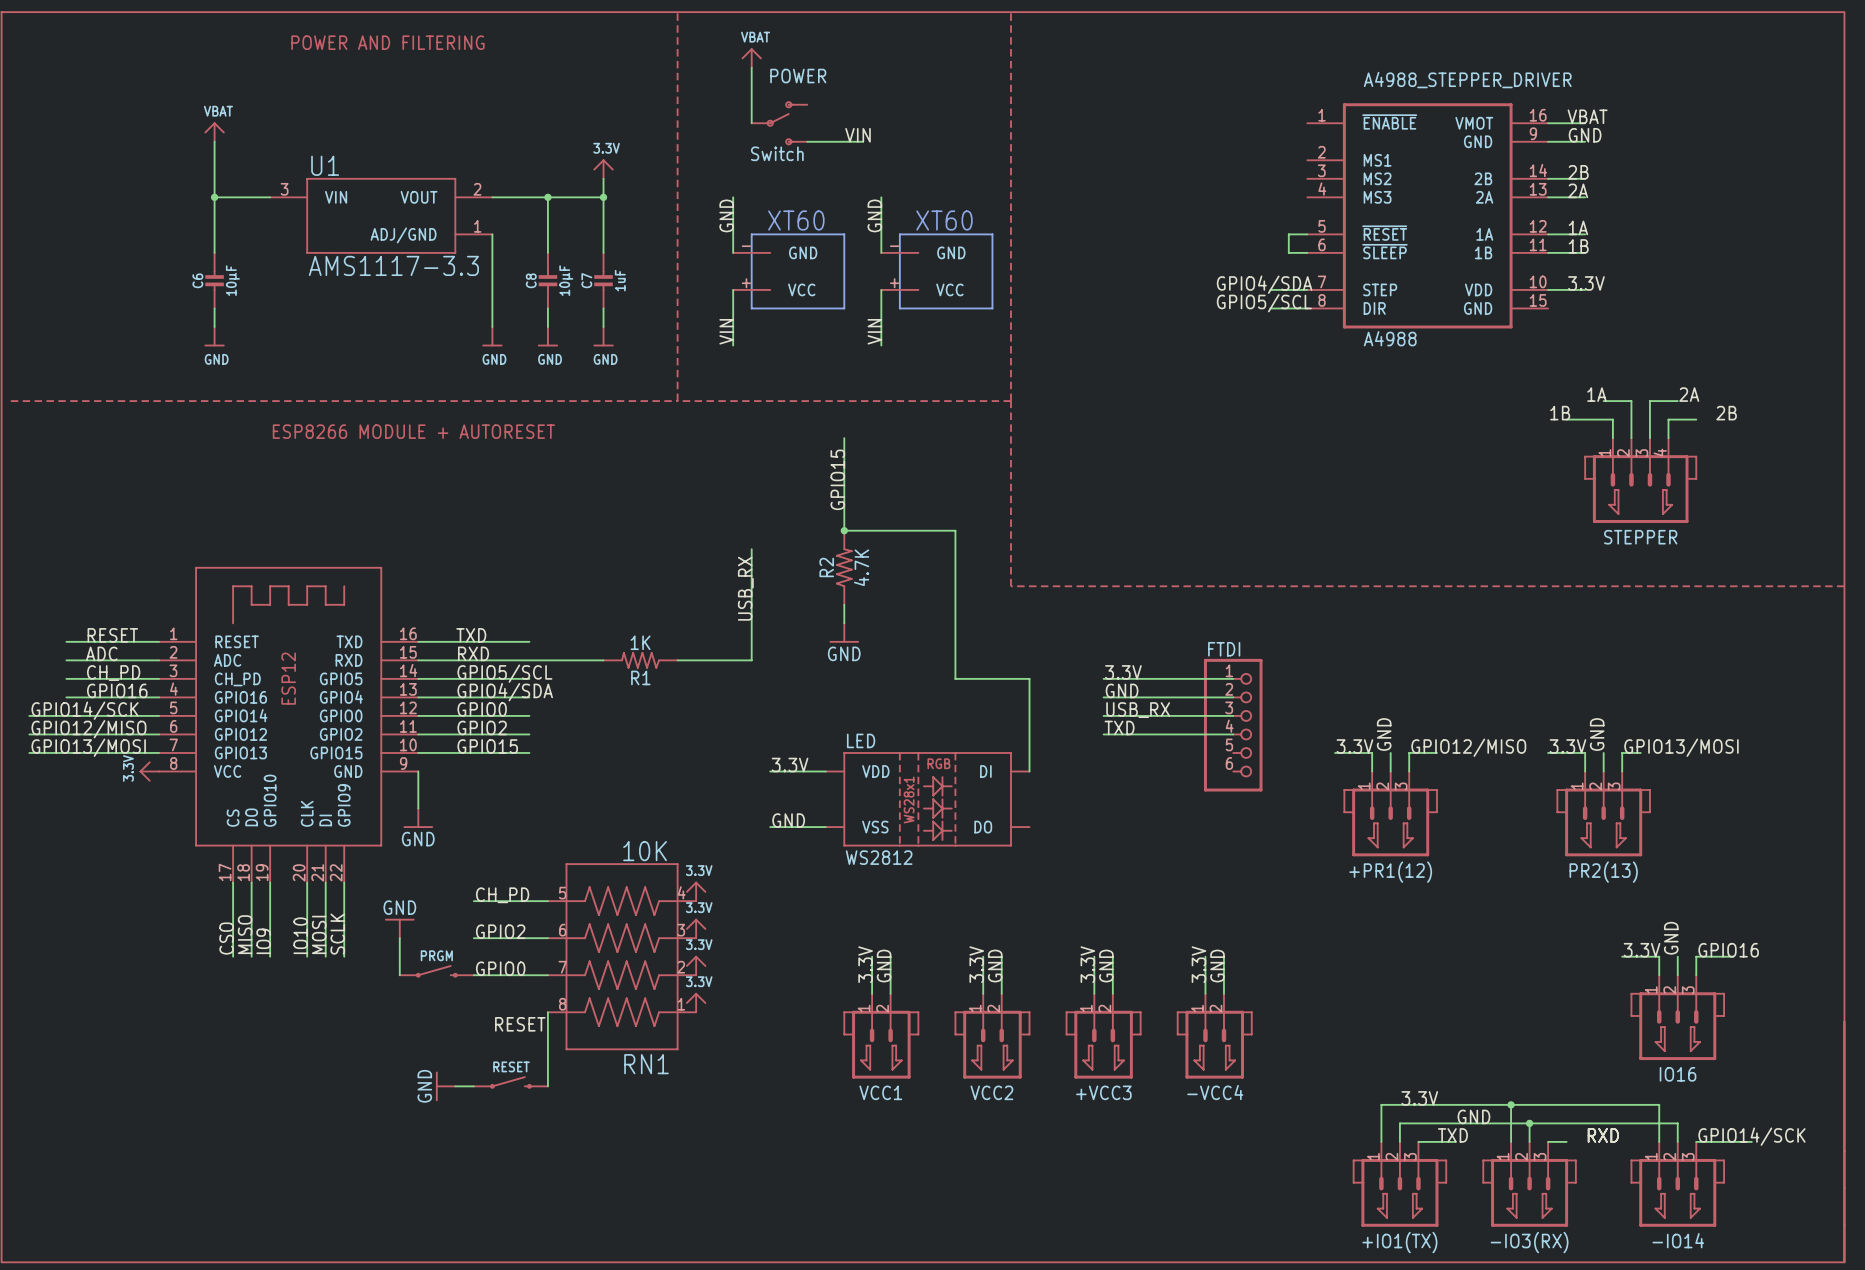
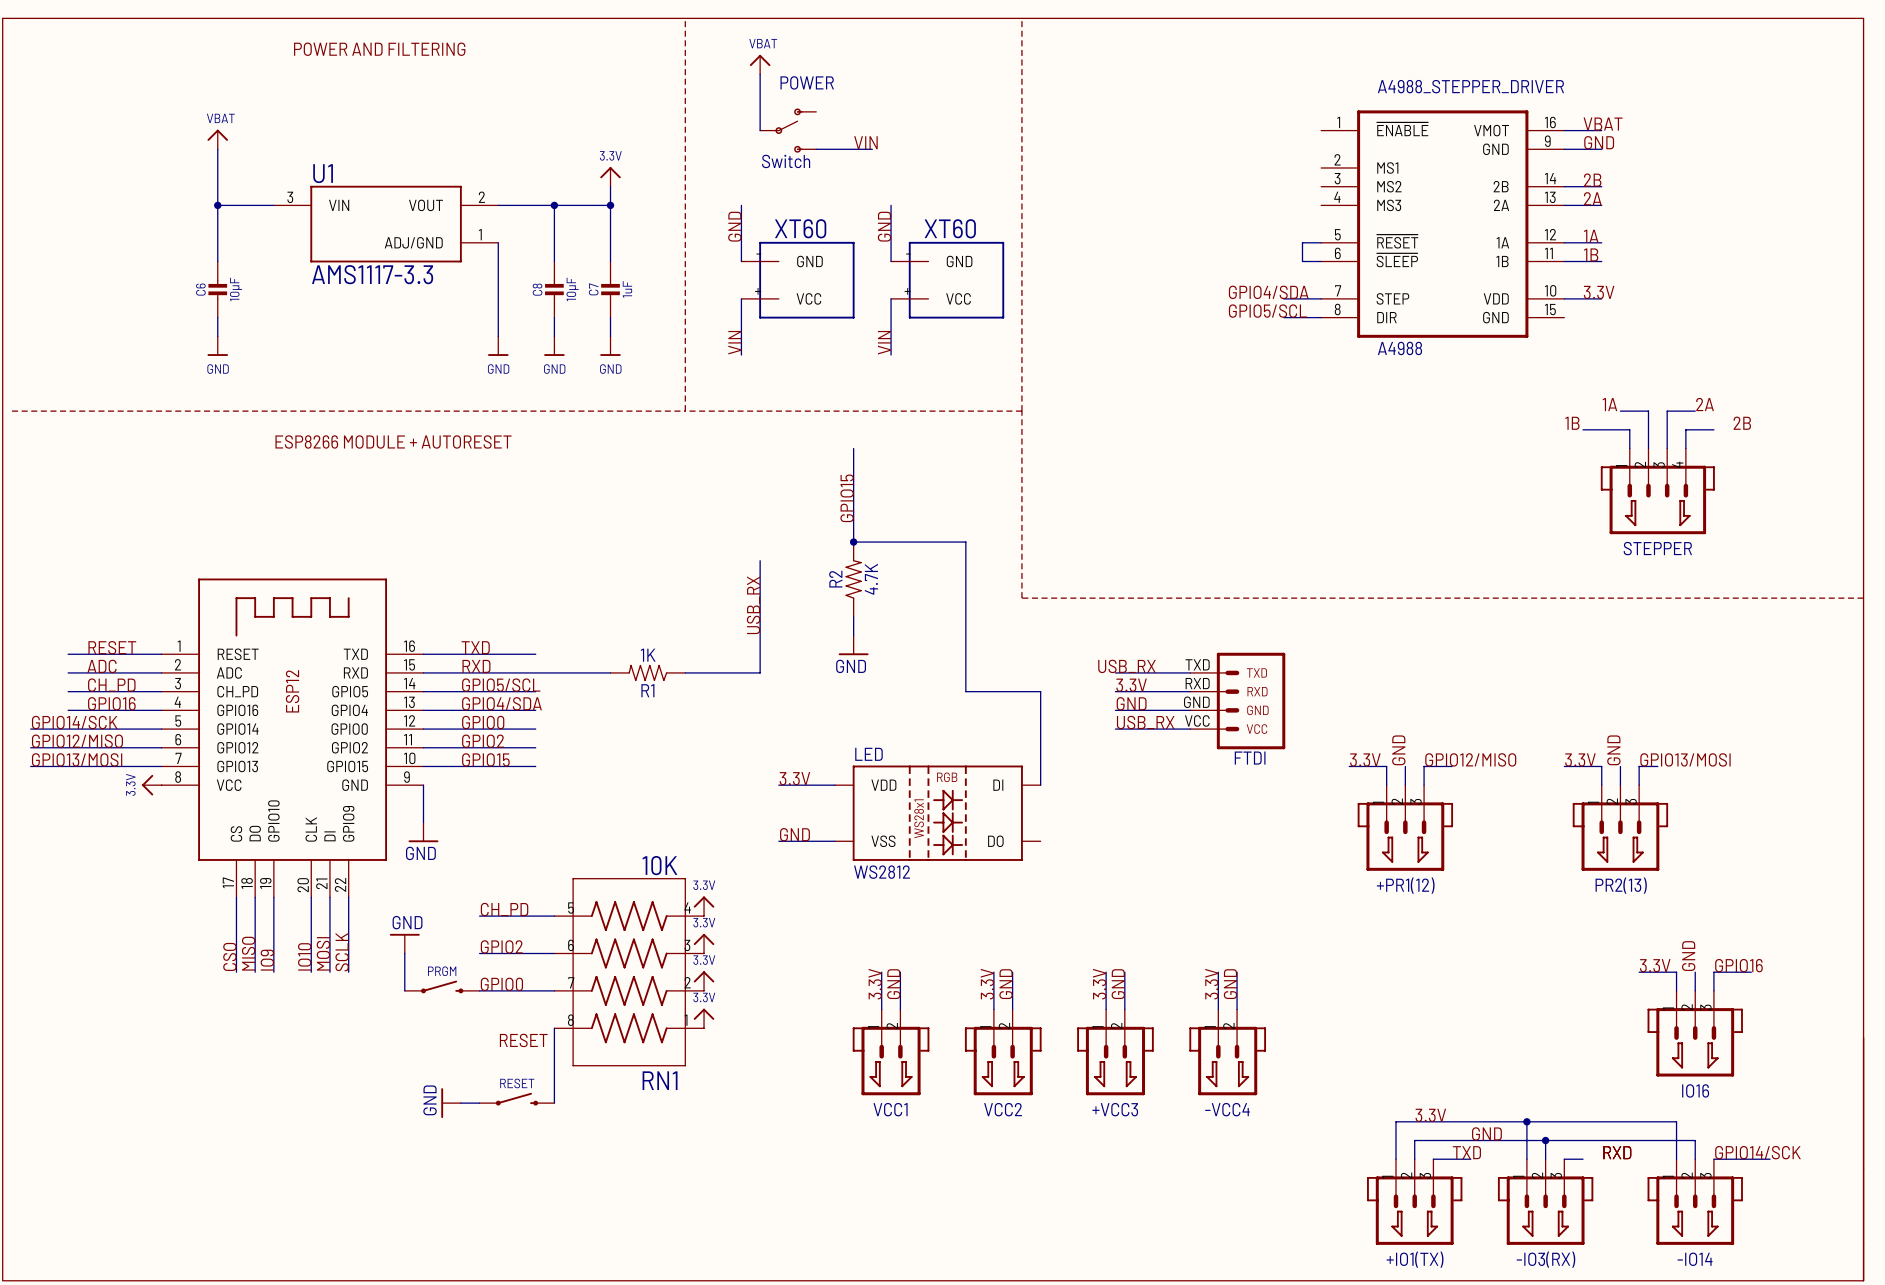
label: none -> USB_RX (1126, 666)
wire: none -> (1115, 672) (1190, 672)
part: none -> (1237, 701)
FTDI: (1233, 725) -> none
label: TXD (1119, 727) -> none
wire: (1103, 734) (1233, 734) -> none

